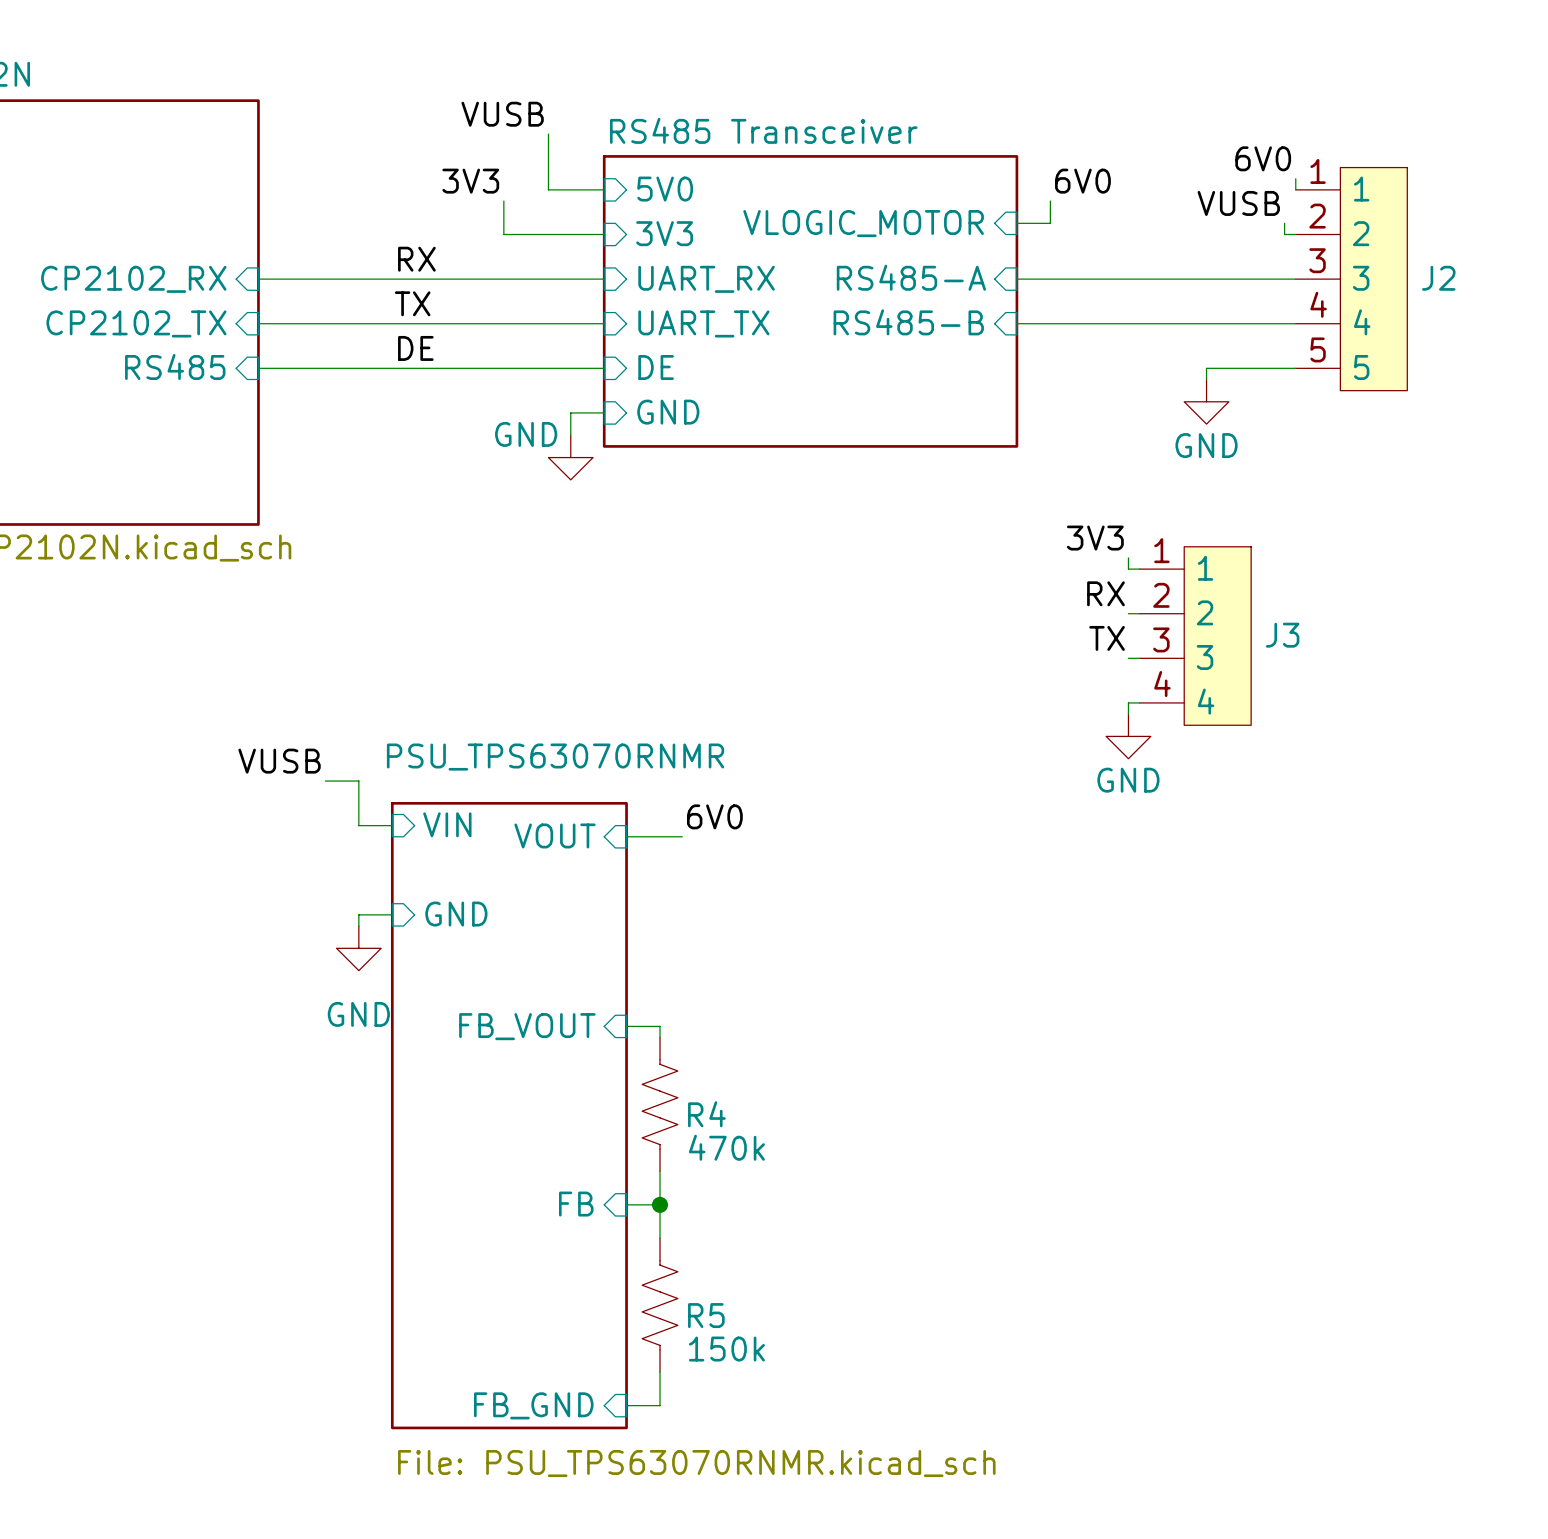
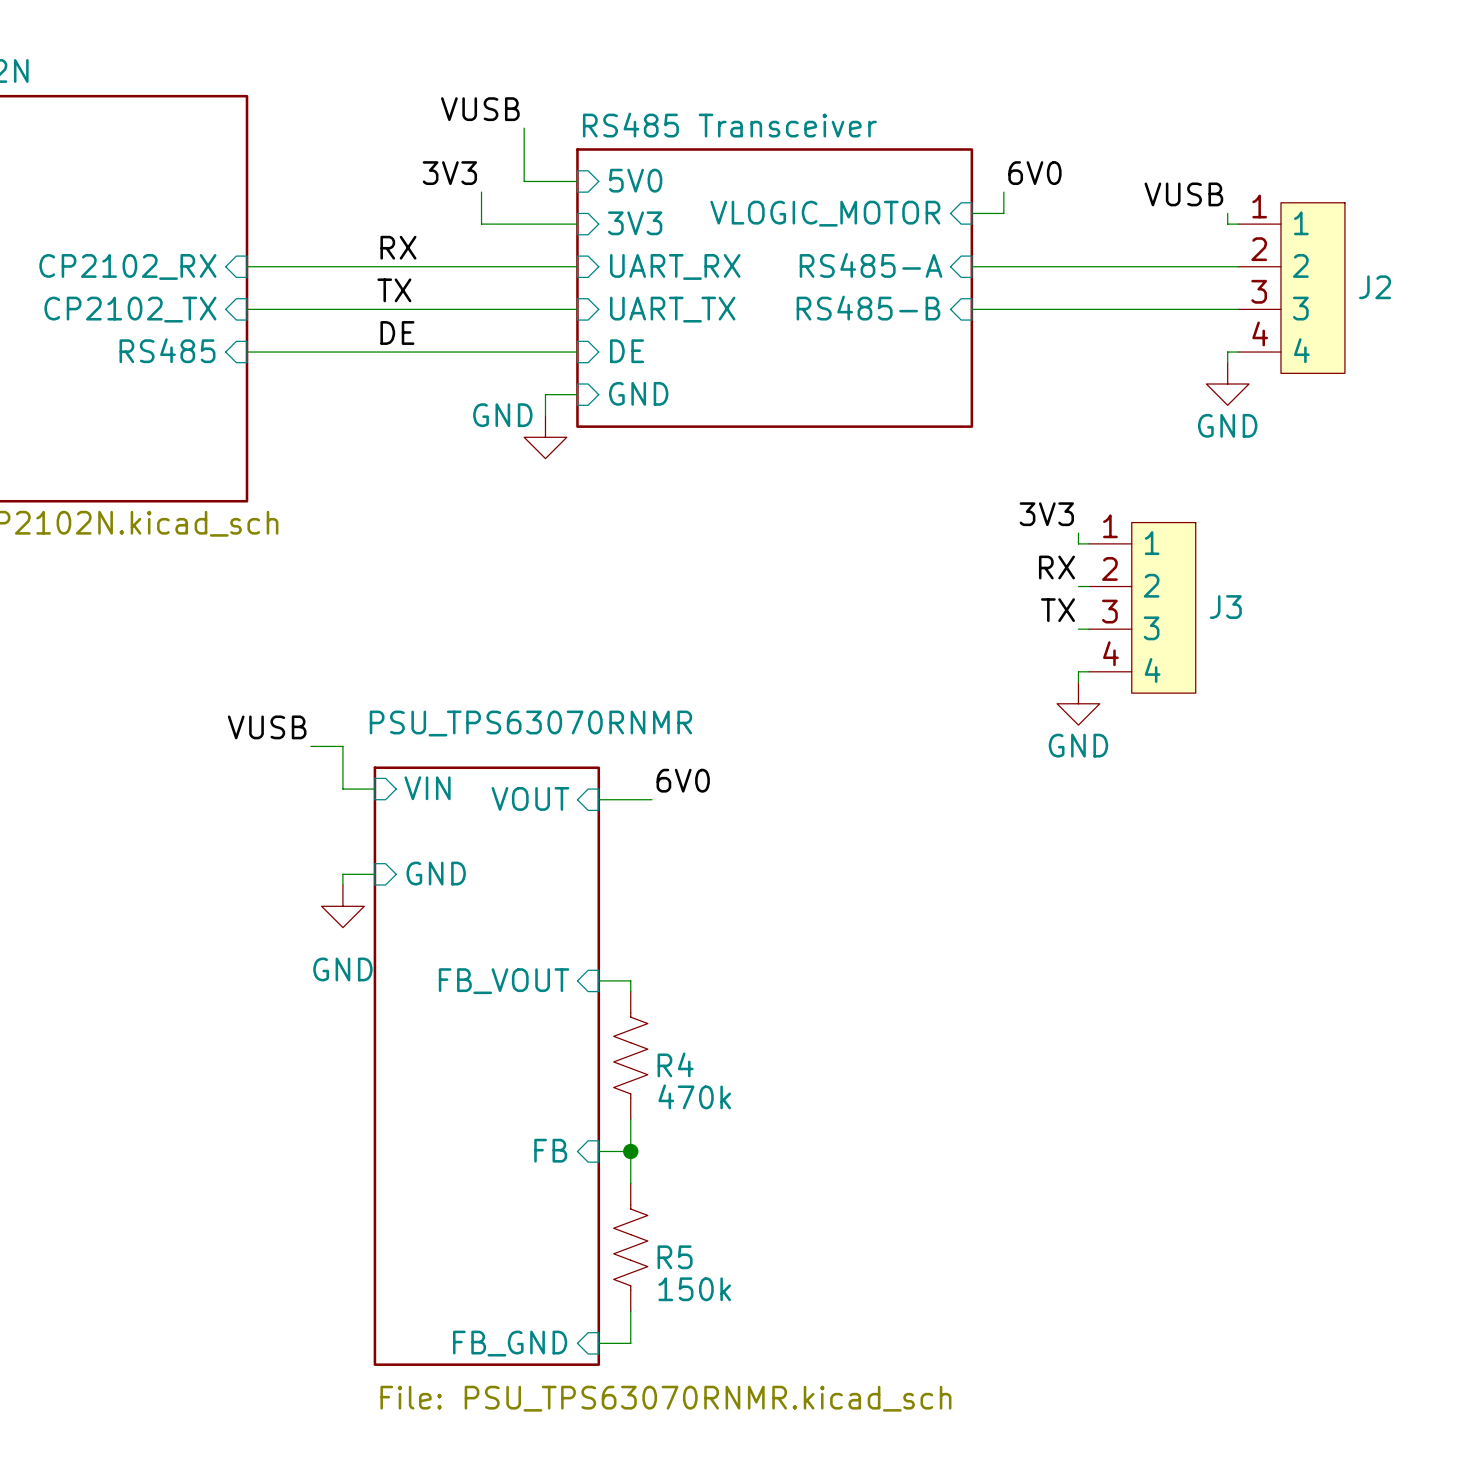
label: 6V0 (1263, 158) -> none
J2 symbol: [1295, 167, 1408, 391] -> [1238, 202, 1345, 374]
wire: (1295, 178) (1295, 189) -> none
wire: (1284, 368) (1206, 368) (1206, 379) -> (1227, 352) (1227, 362)
power symbol position: GND (1206, 401) -> GND (1227, 384)

